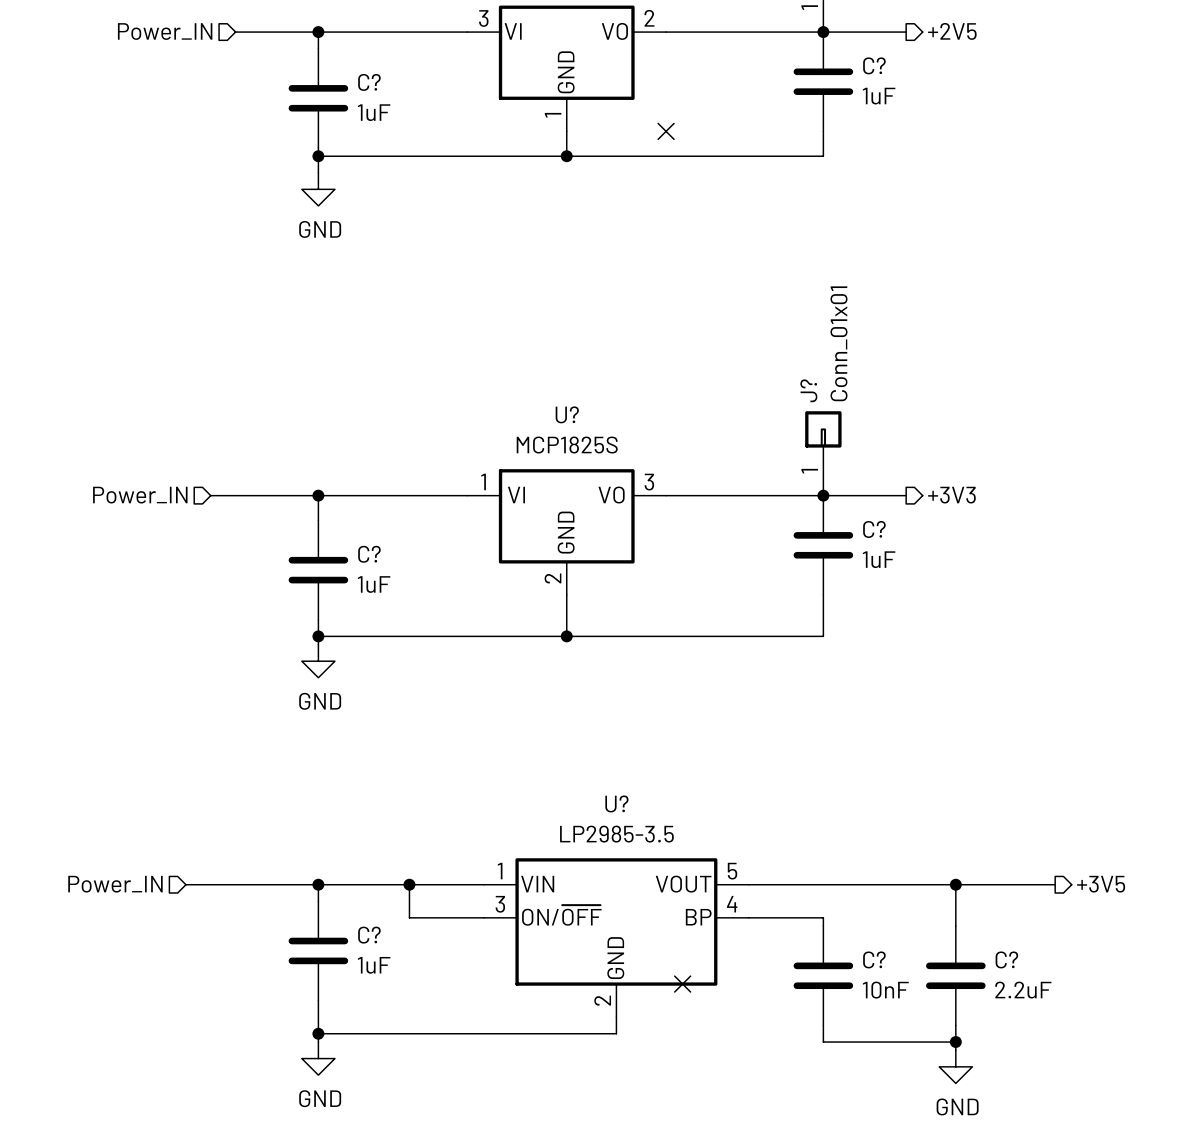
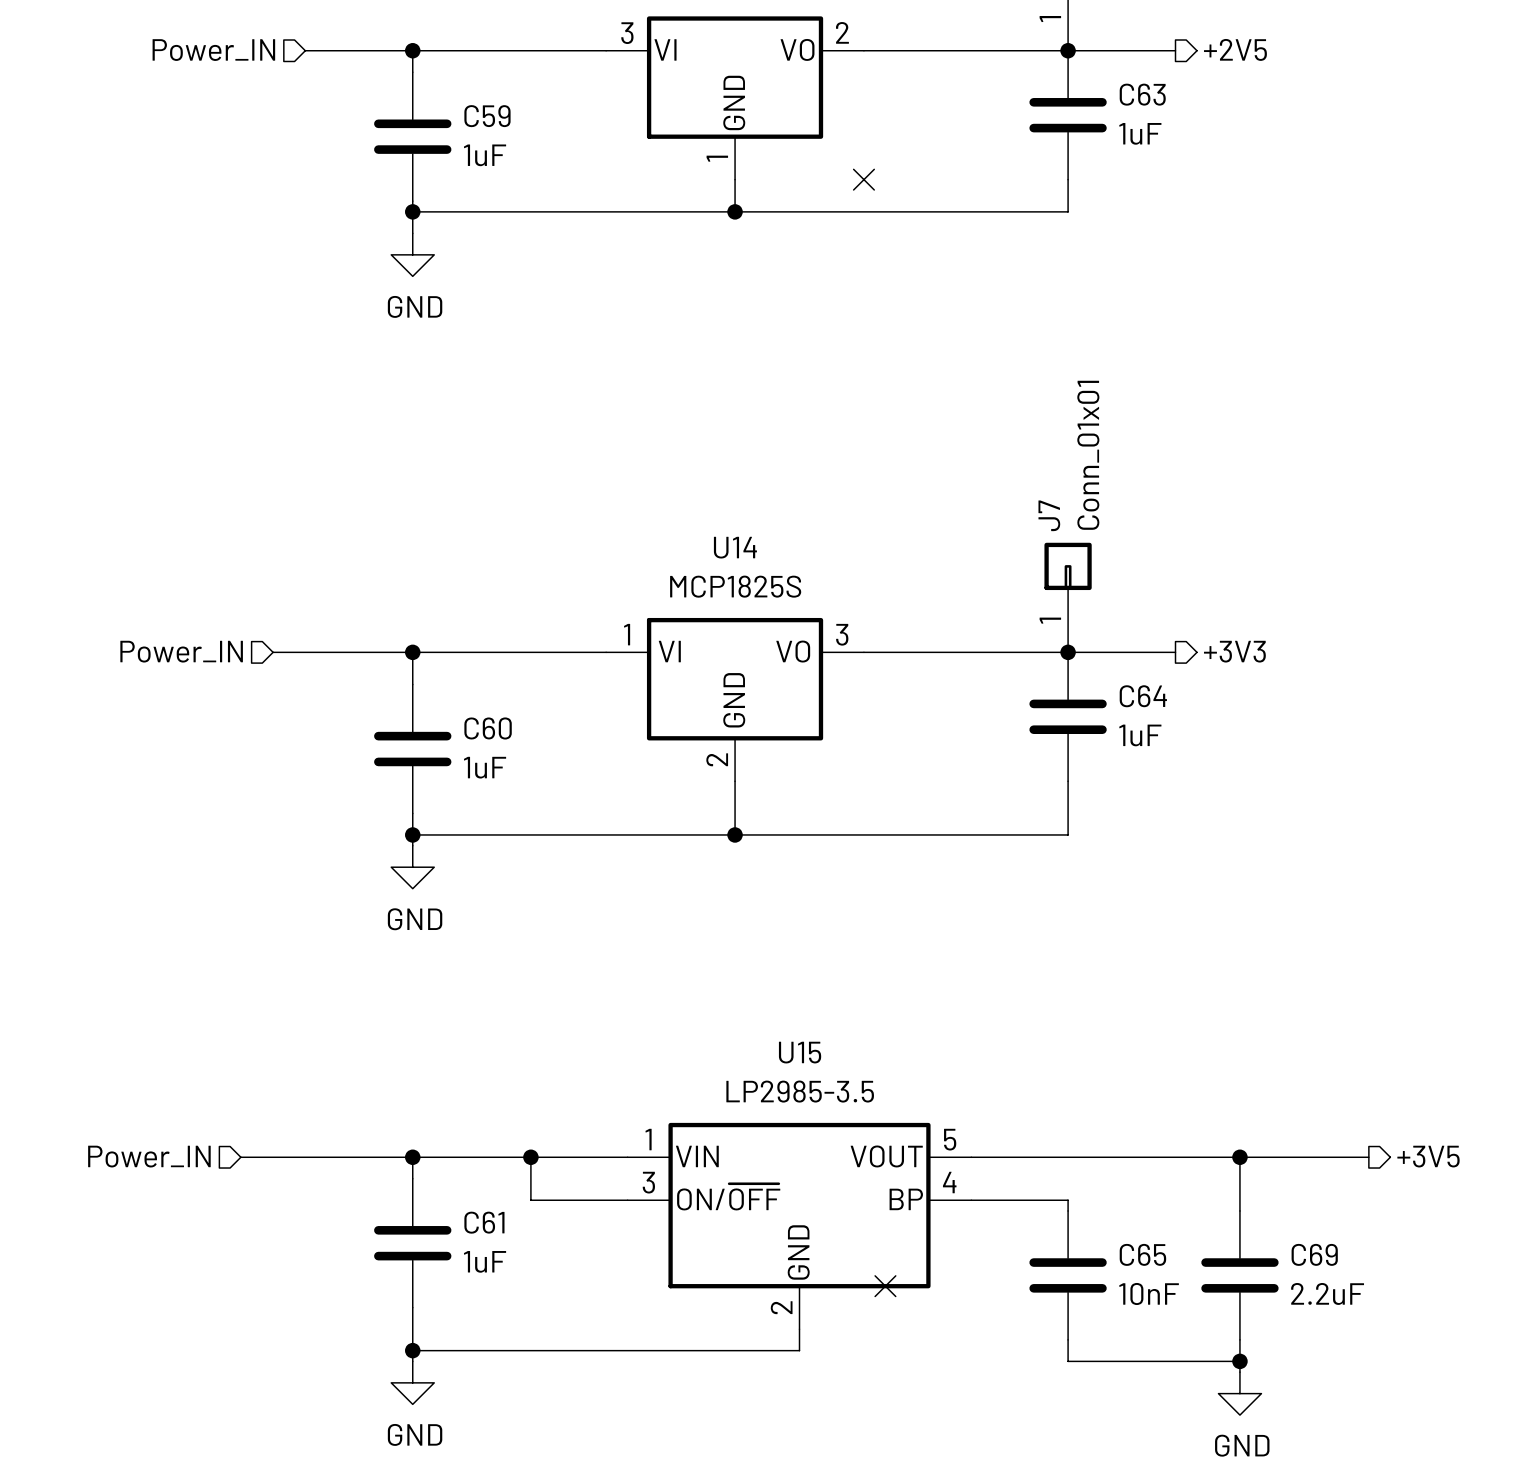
C? name: C? (874, 65) -> C63 (1142, 94)
C? name: C? (369, 82) -> C59 (487, 116)
J? name: J? (808, 390) -> J7 (1049, 515)
U? name: U? (567, 414) -> U14 (735, 547)
C? name: C? (874, 529) -> C64 (1143, 696)
C? name: C? (369, 554) -> C60 (488, 728)
U? name: U? (616, 803) -> U15 (800, 1052)
C? name: C? (369, 935) -> C61 (484, 1222)
C? name: C? (874, 959) -> C65 (1142, 1254)
C? name: C? (1006, 959) -> C69 (1314, 1254)

